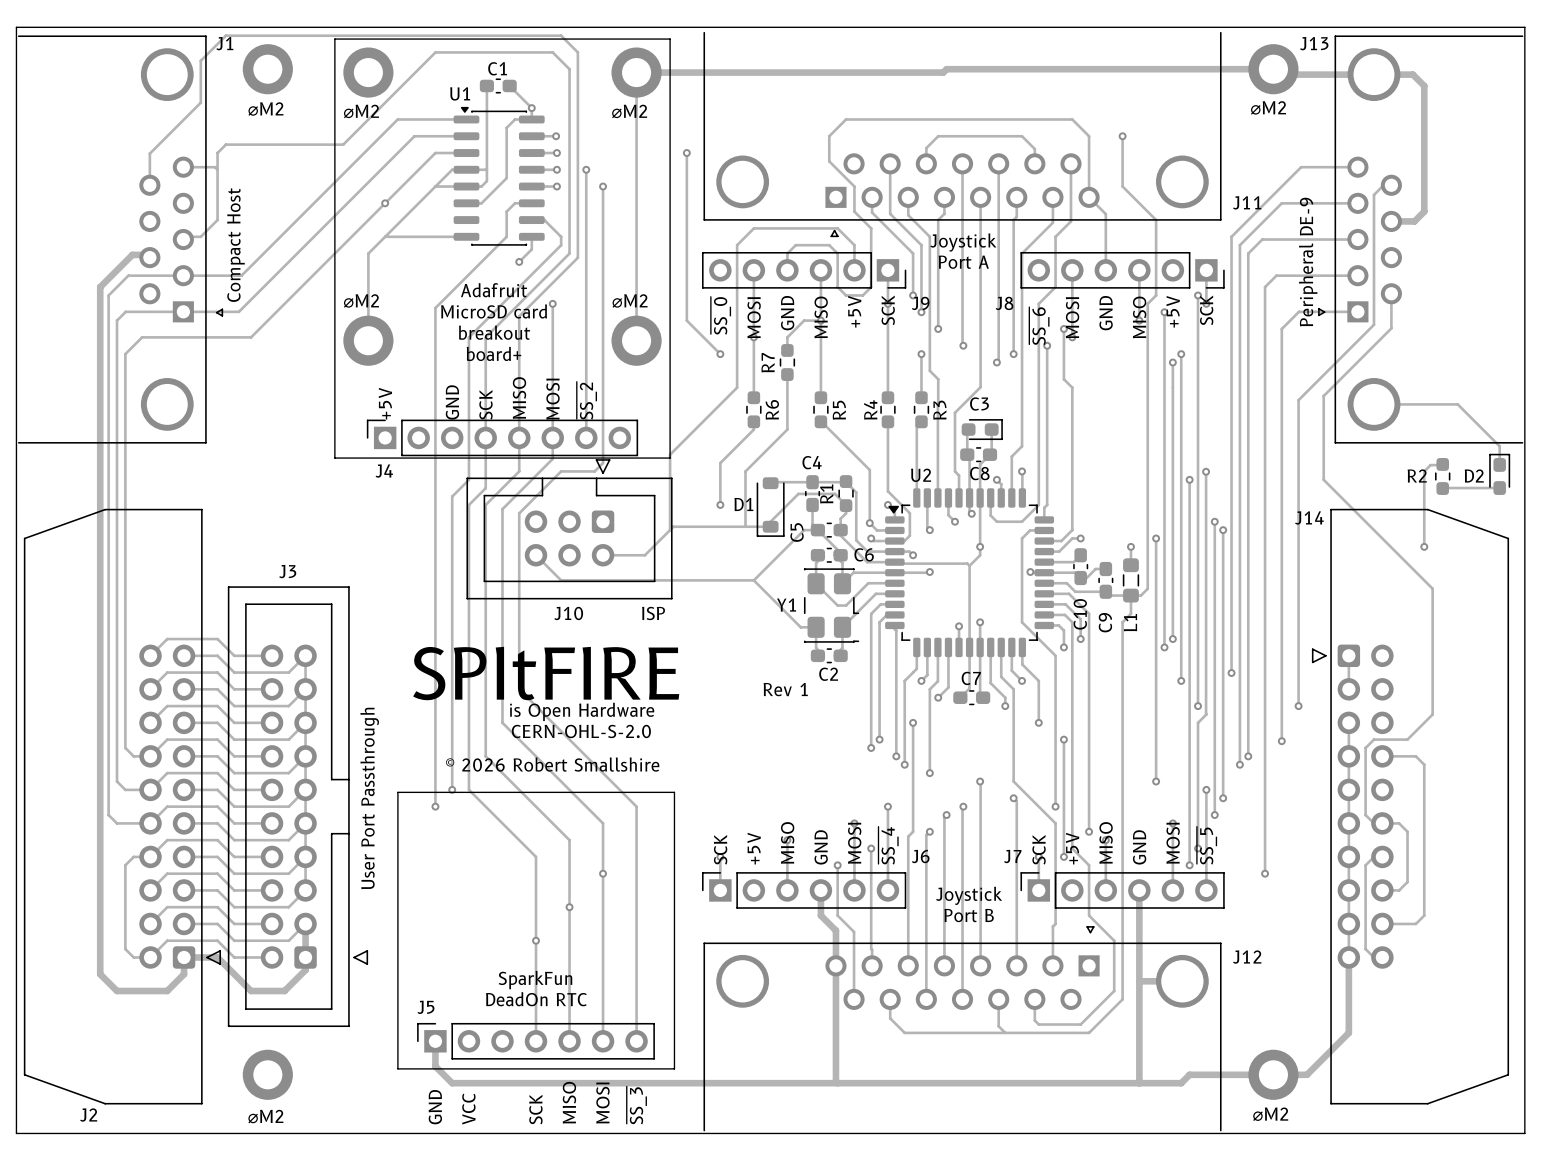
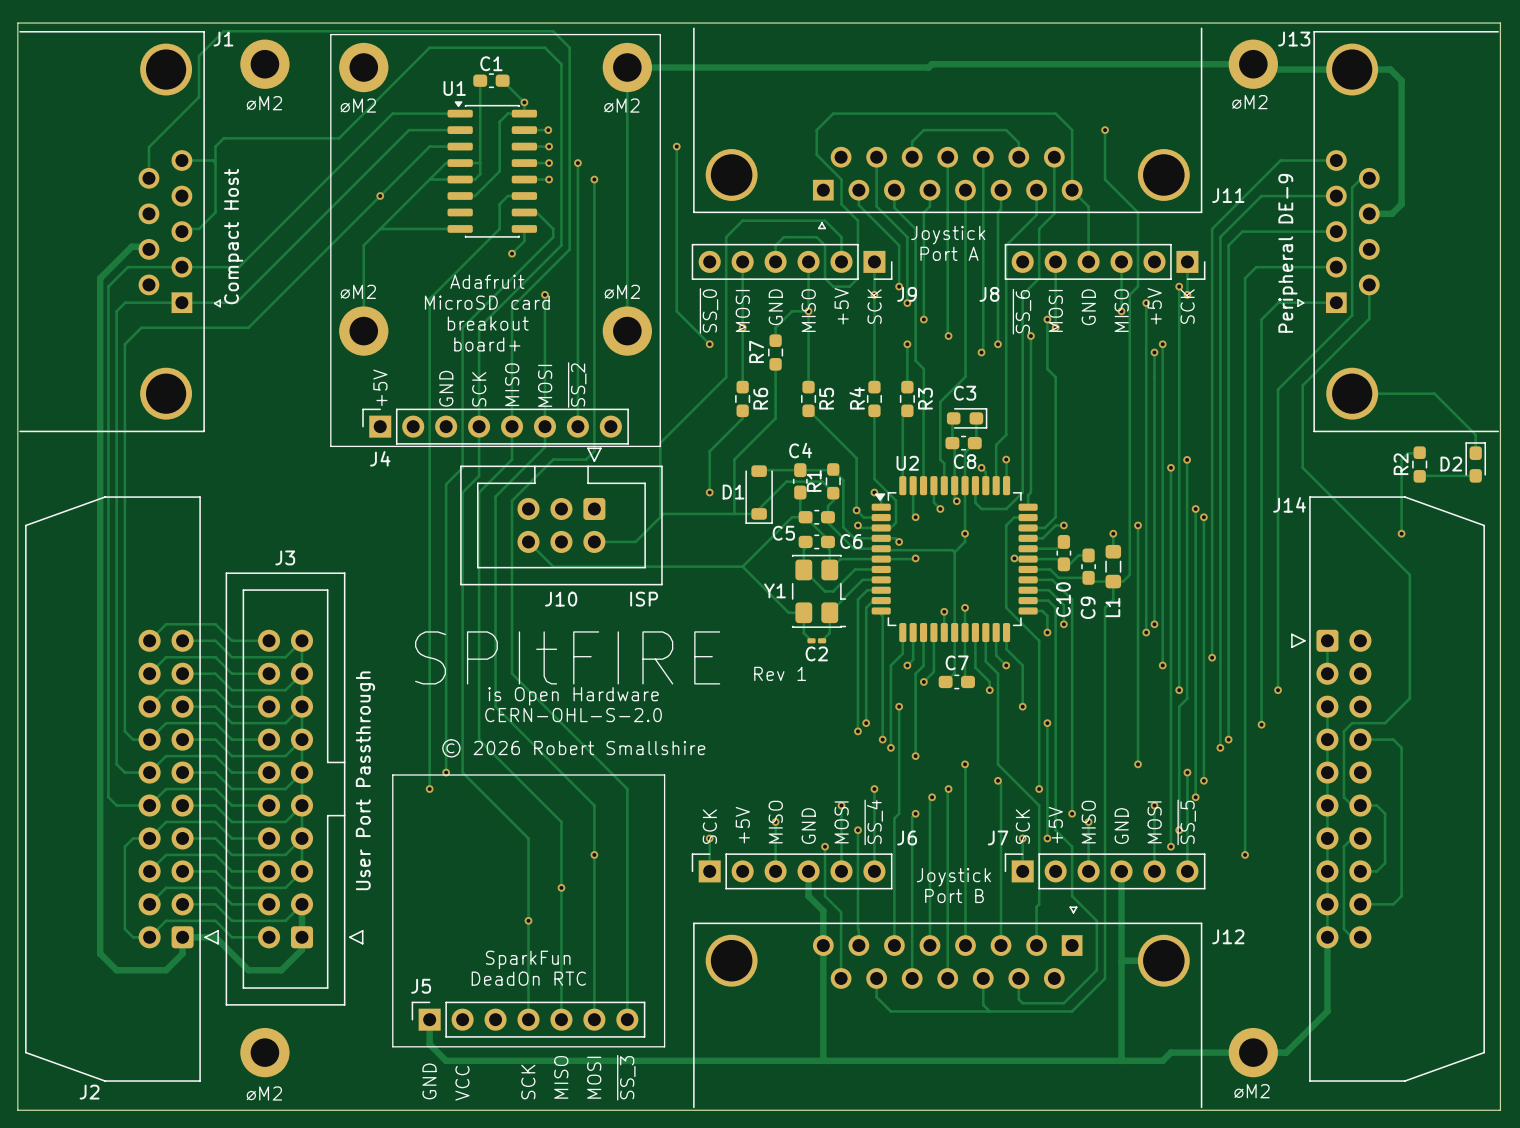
R2 name rotation: 0° (1417, 476) -> 90° counterclockwise (1401, 464)
C5 name rotation: 0° (797, 532) -> 90° clockwise (783, 533)
C2 footprint: [810, 648, 848, 664] -> [807, 638, 827, 644]

